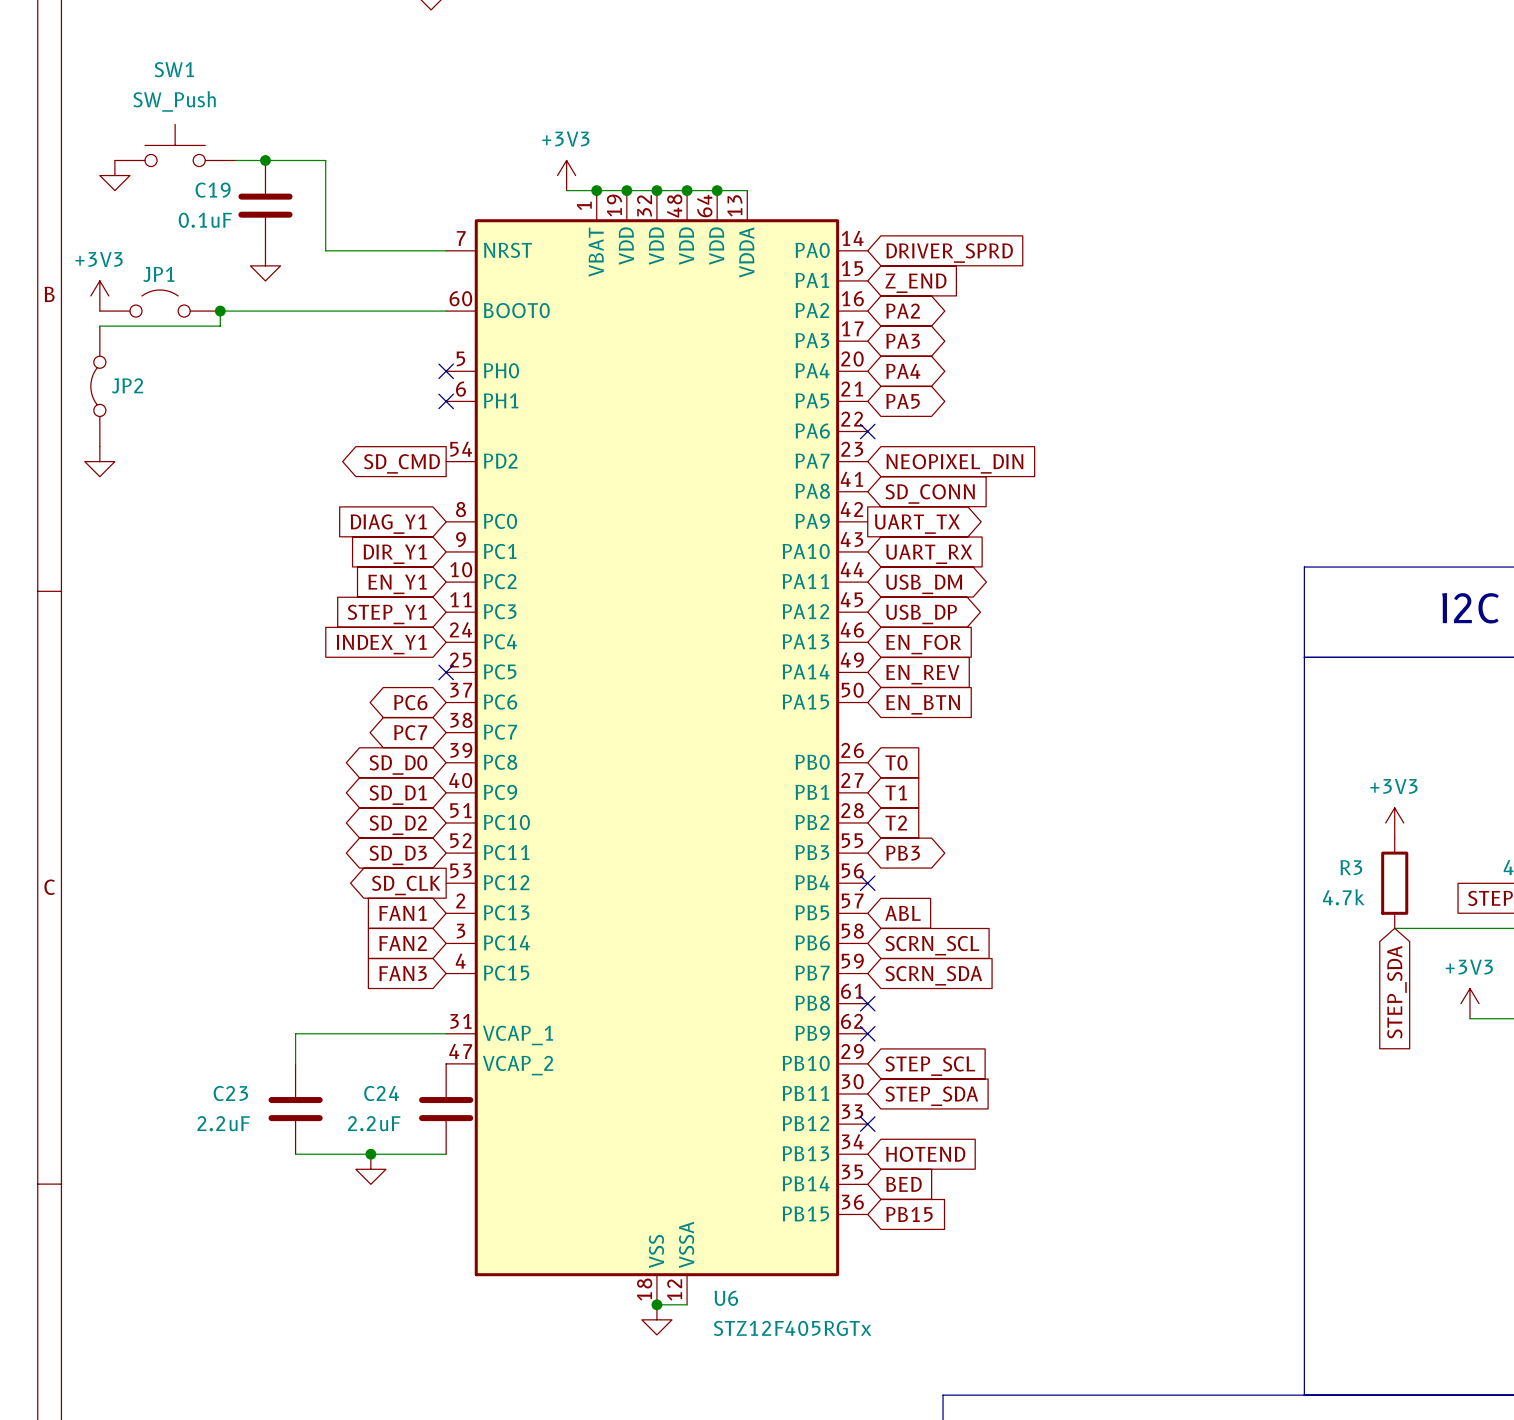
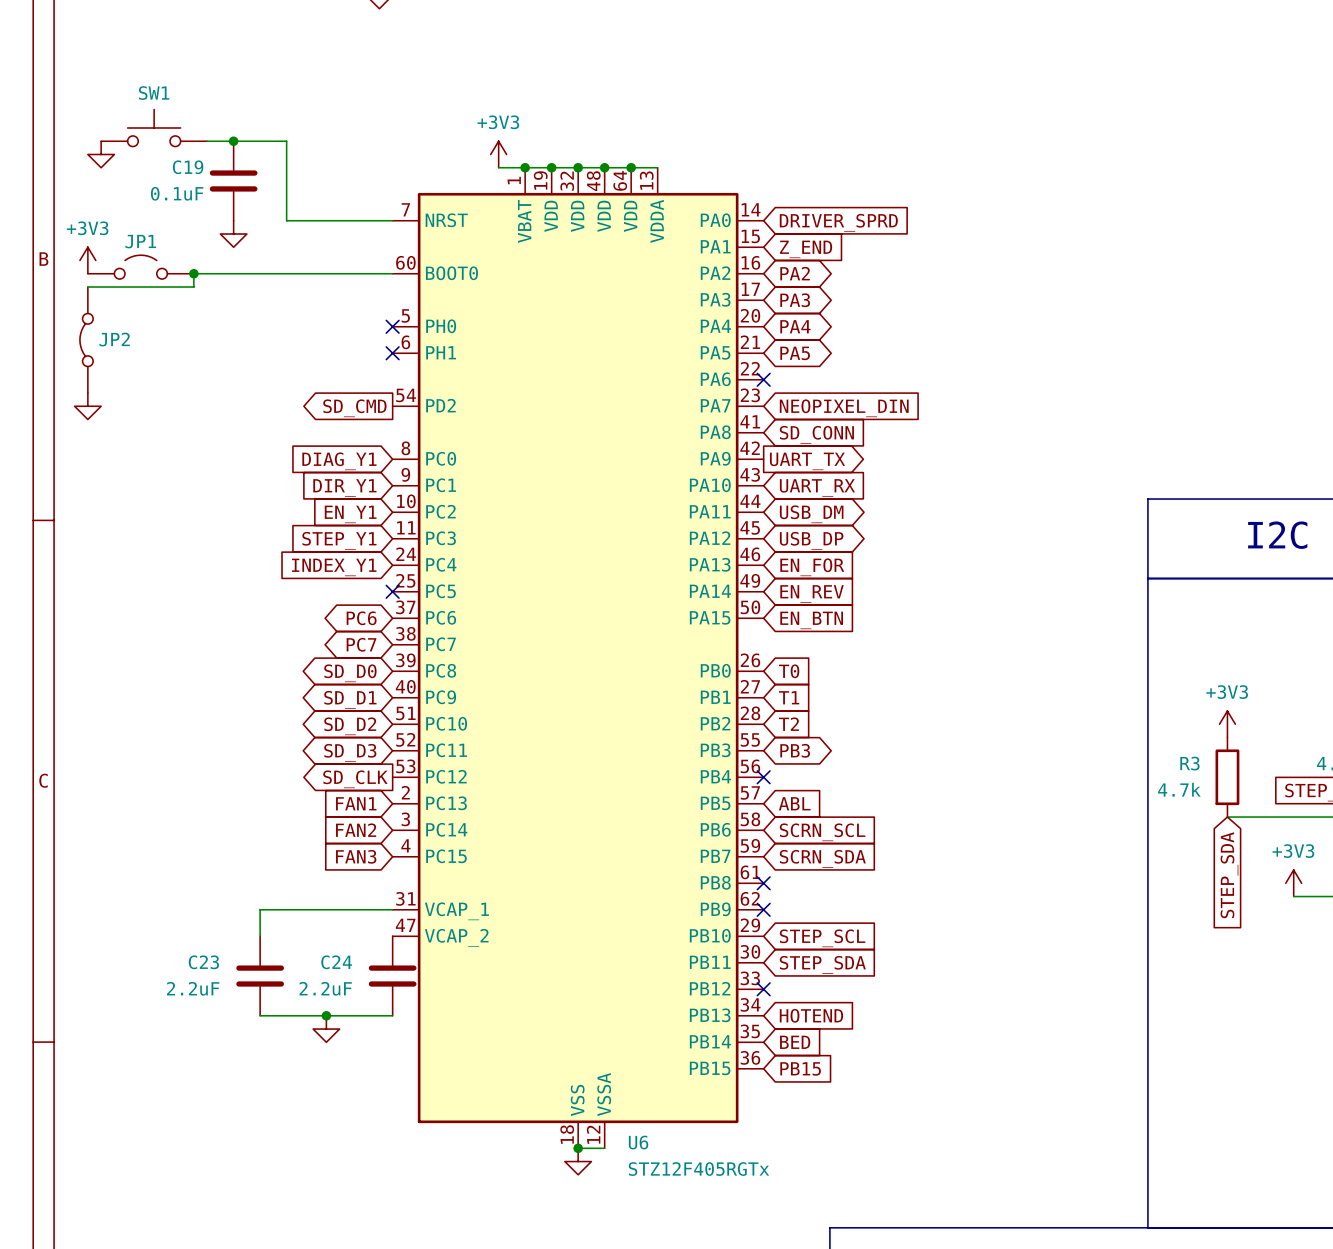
SW1 name position: SW1 (174, 69) -> SW1 (154, 93)
SW1 value: SW_Push (174, 101) -> none

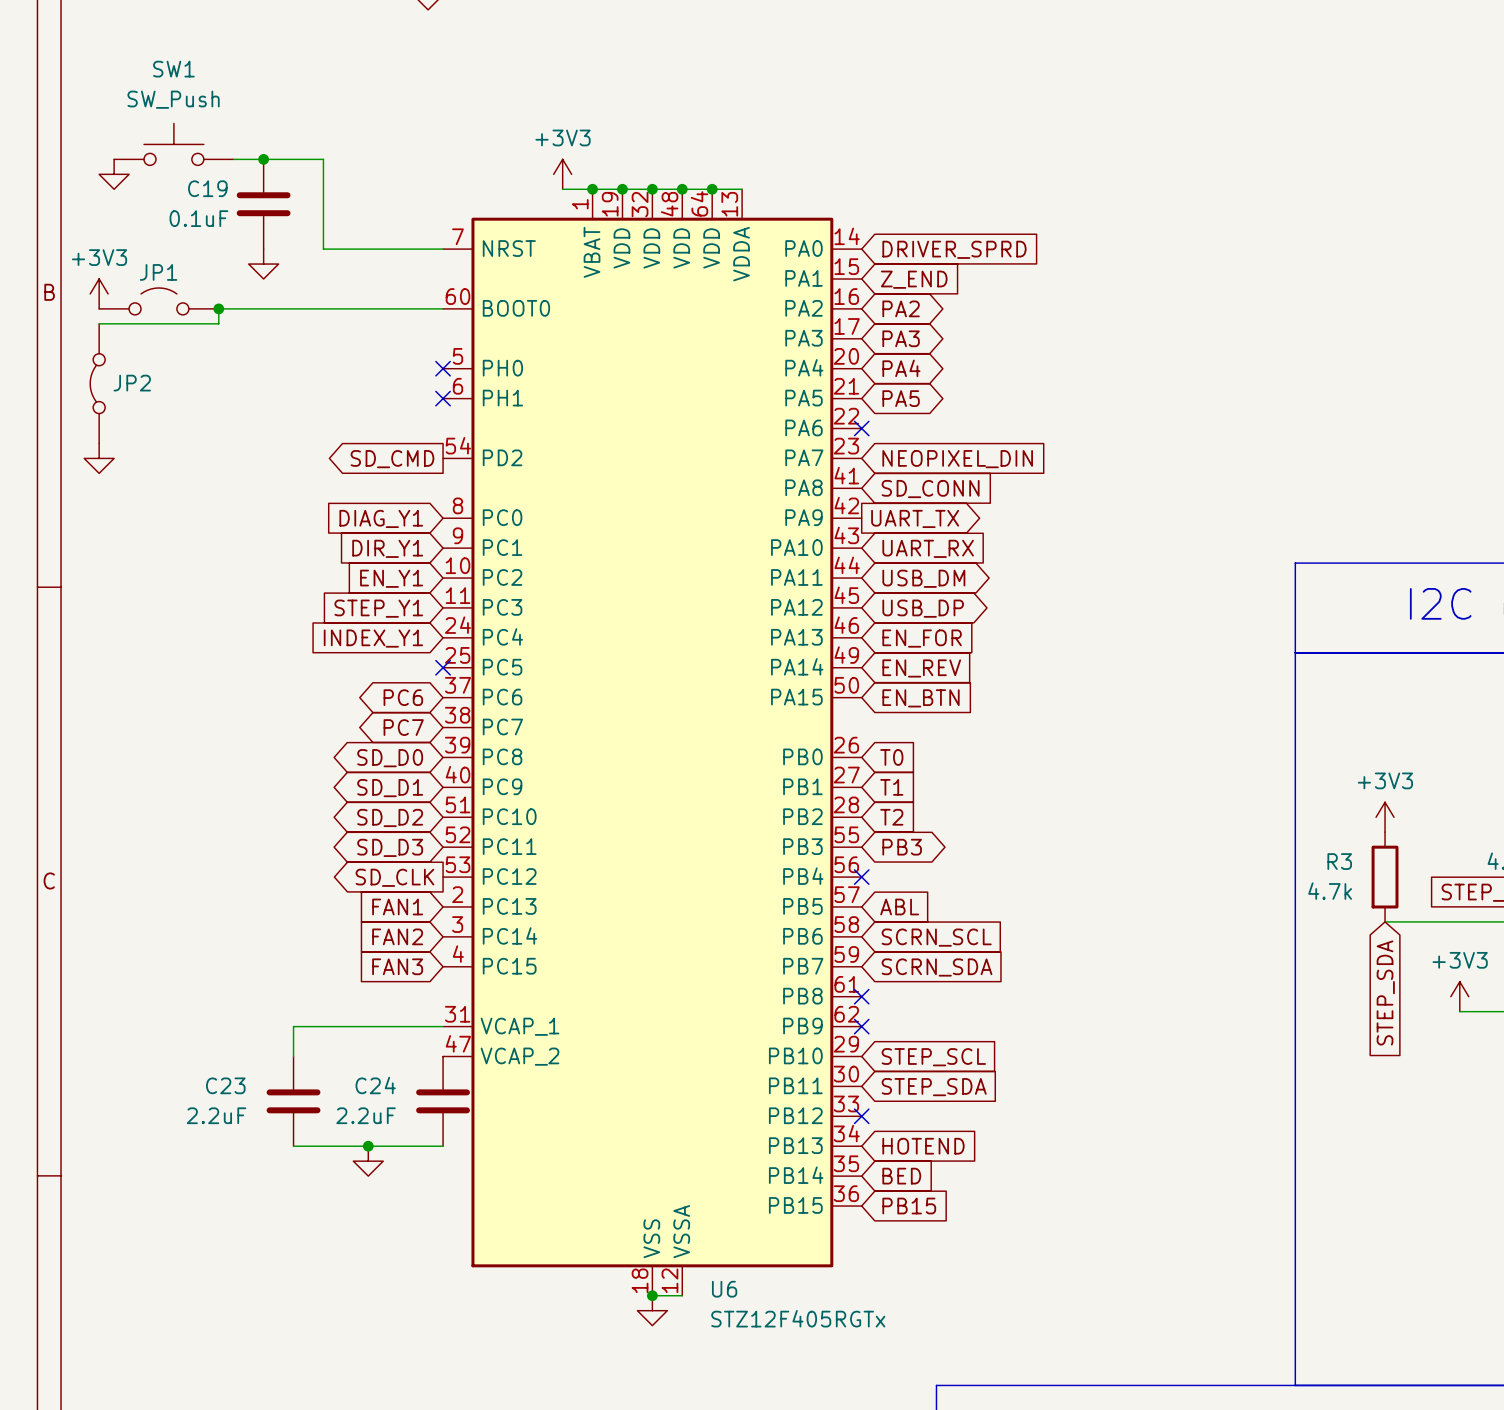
SW1 value: none -> SW_Push (173, 99)
SW1 name position: SW1 (154, 93) -> SW1 (173, 69)

